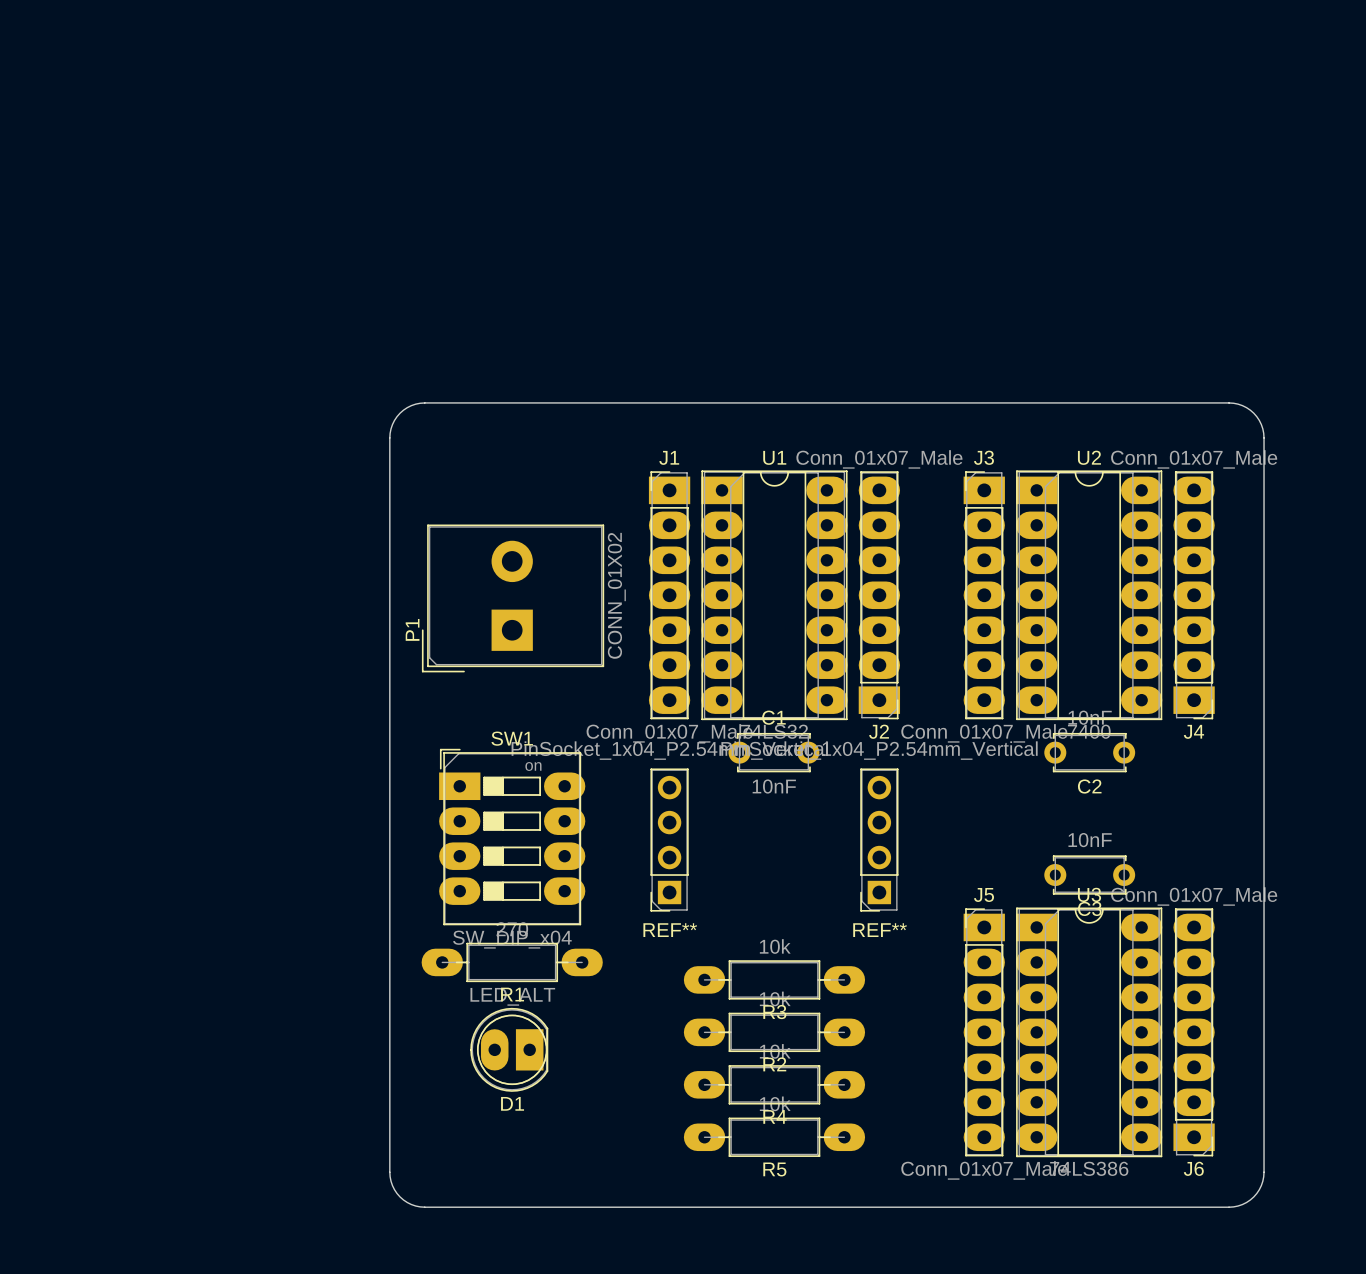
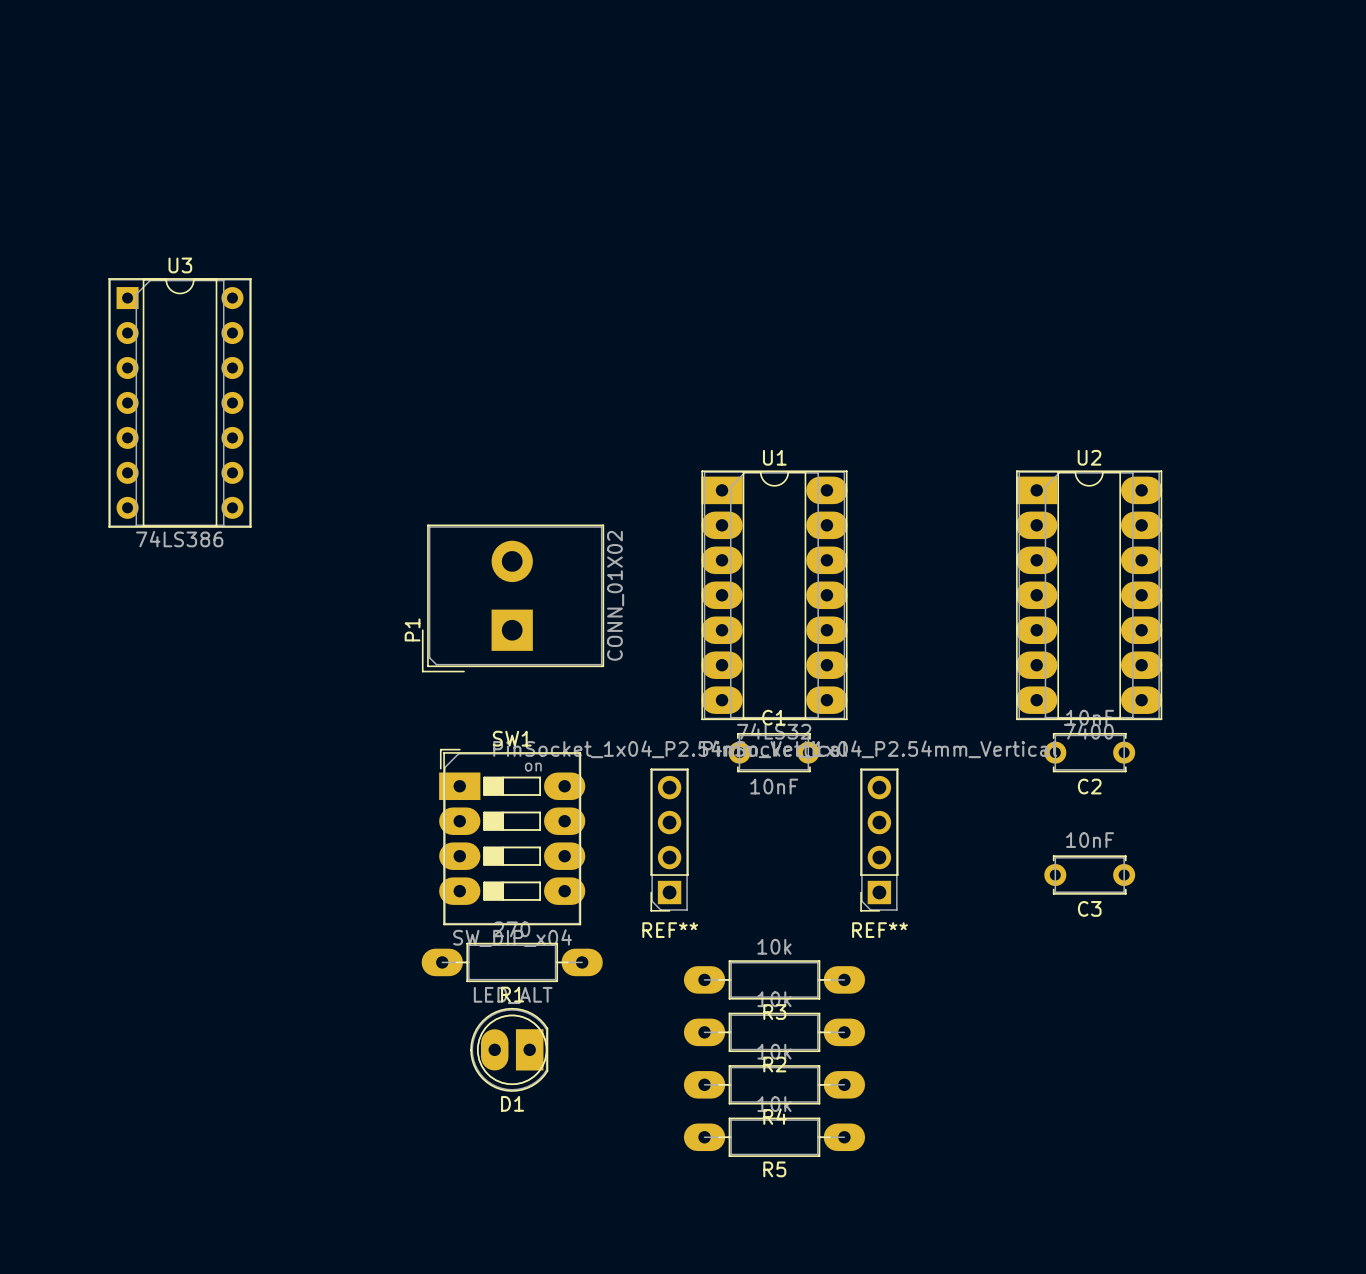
board edge: (424, 402) (1229, 402) (1242, 405) (1253, 413) (1261, 424) (1264, 437) (1264, 1172) (1261, 1185) (1253, 1196) (1242, 1204) (1229, 1207) (424, 1207) (411, 1204) (400, 1196) (392, 1185) (389, 1172) (389, 437) (392, 424) (400, 413) (411, 405) (424, 402) -> none
J1: Conn_01x07_Male (669, 595) -> none
J2: Conn_01x07_Male (879, 595) -> none
J3: Conn_01x07_Male (984, 595) -> none
J4: Conn_01x07_Male (1194, 595) -> none
U3 footprint: [1016, 907, 1163, 1158] -> [108, 278, 252, 528]
J5: Conn_01x07_Male (984, 1032) -> none
J6: Conn_01x07_Male (1194, 1032) -> none

